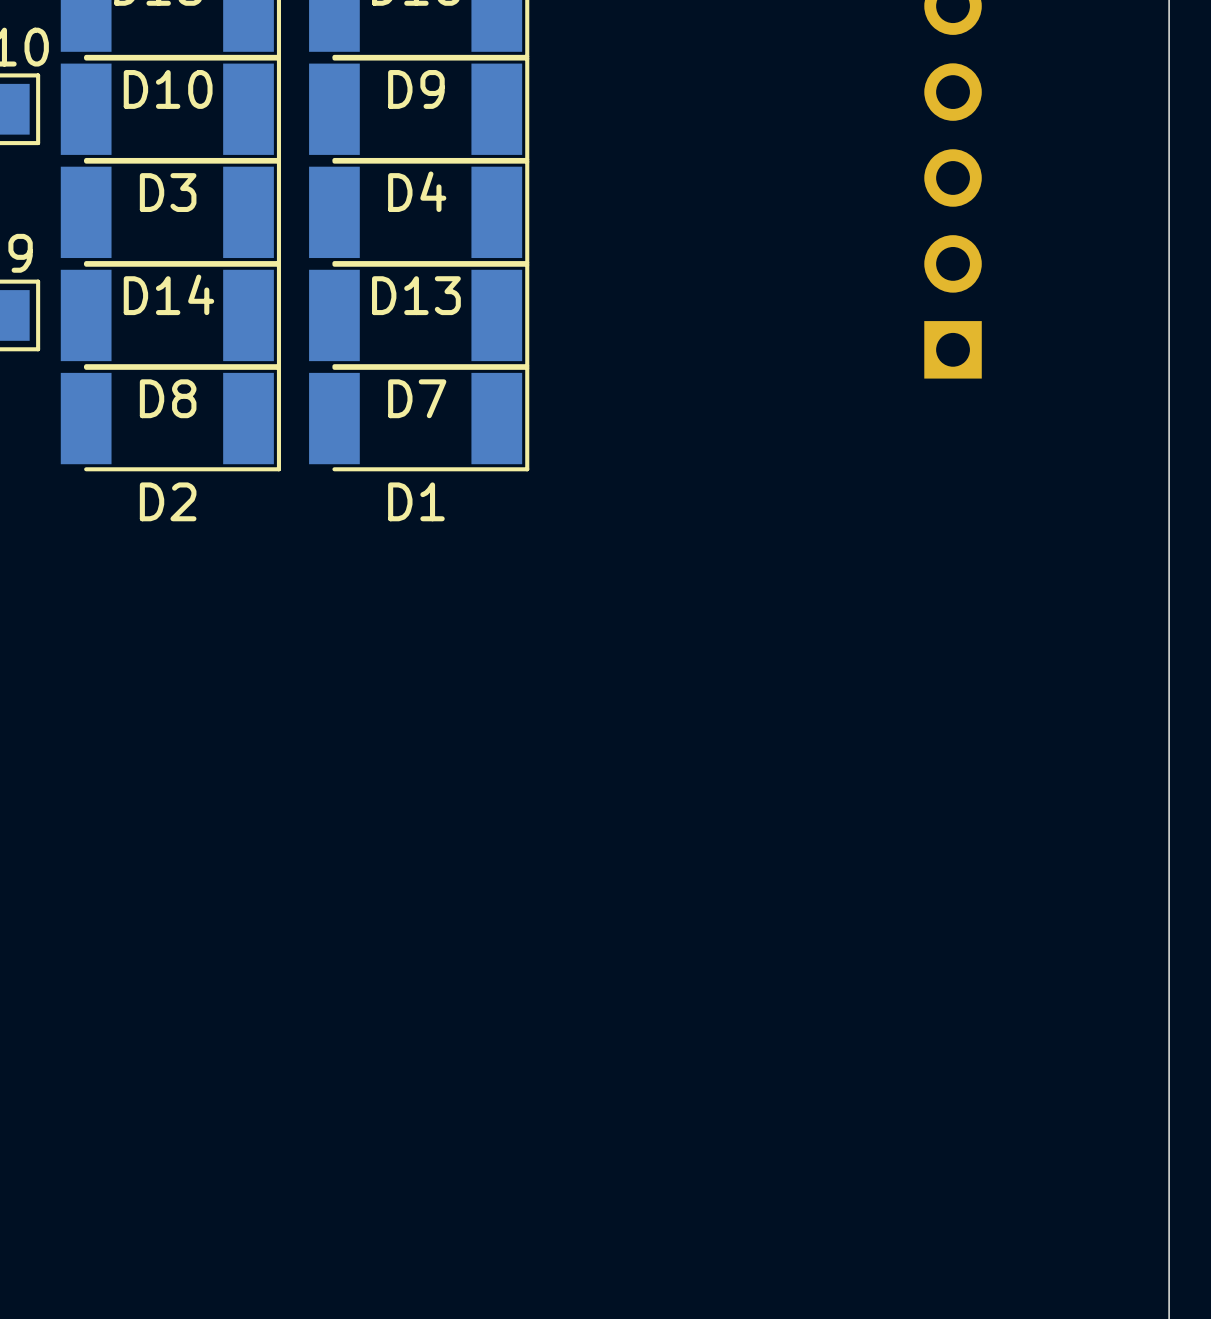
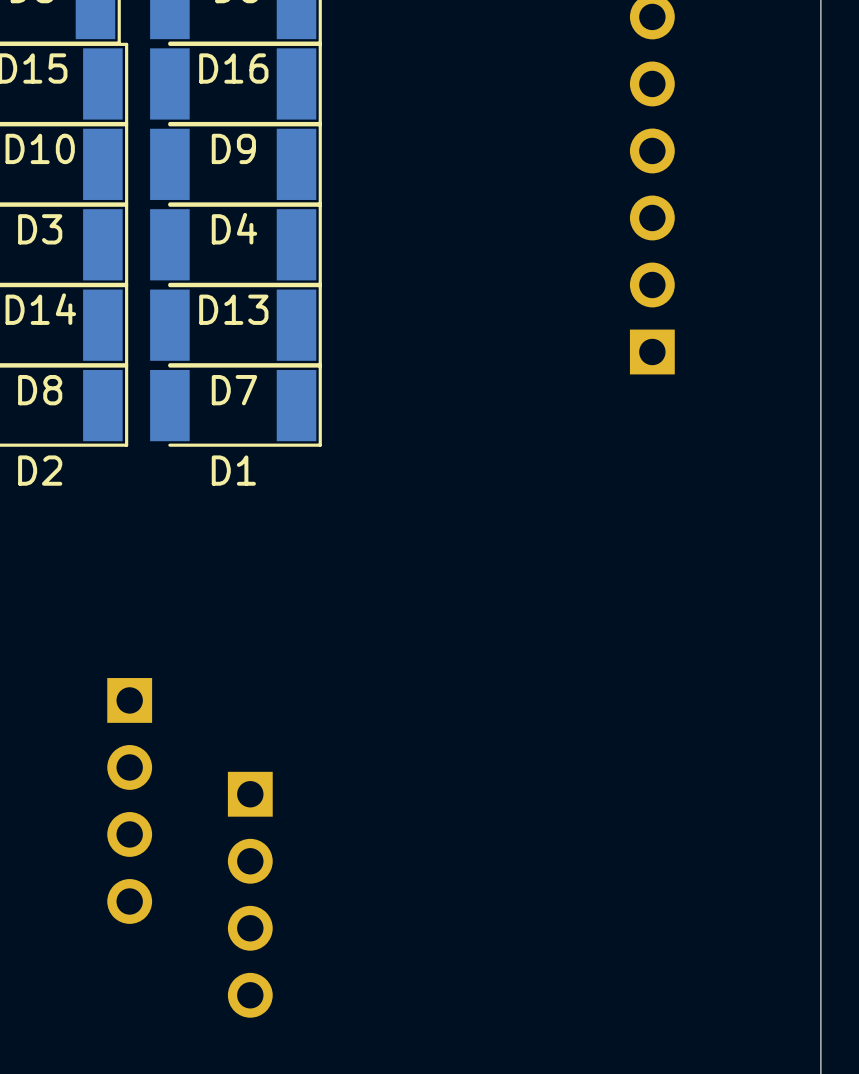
part: none -> (129, 800)
part: none -> (250, 894)

